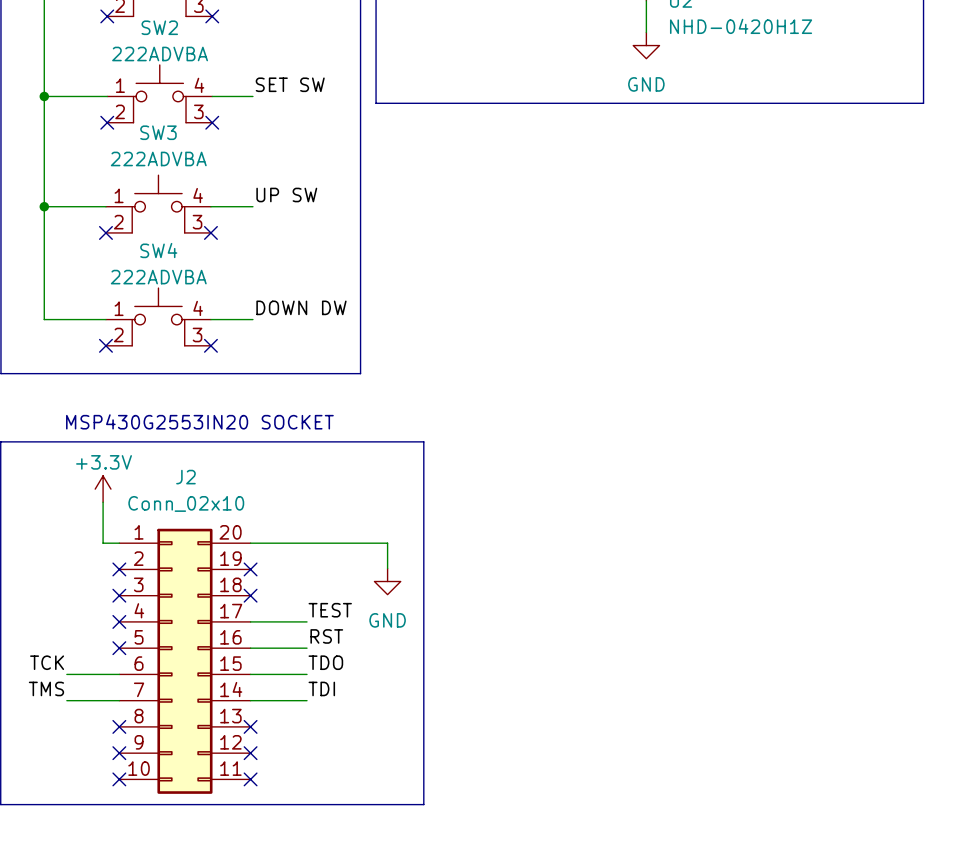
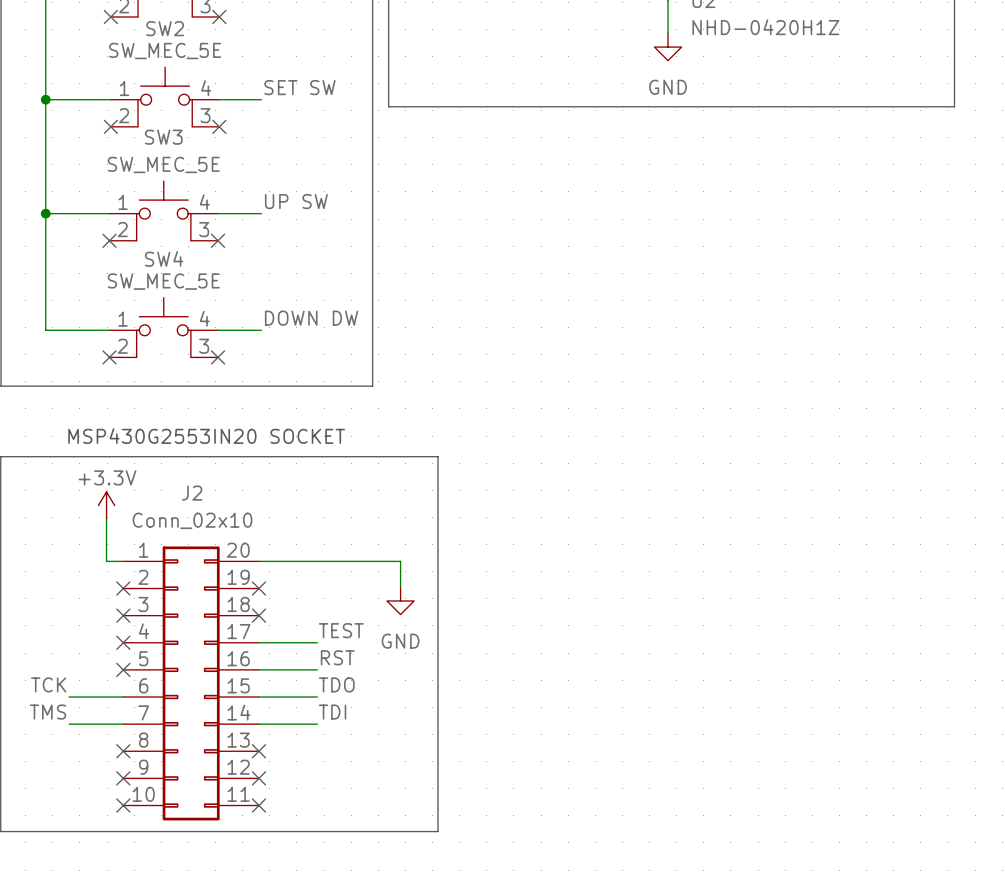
SW2 value: 222ADVBA (160, 53) -> SW_MEC_5E (165, 51)
SW3 value: 222ADVBA (158, 158) -> SW_MEC_5E (163, 164)
SW4 value: 222ADVBA (158, 277) -> SW_MEC_5E (163, 281)

